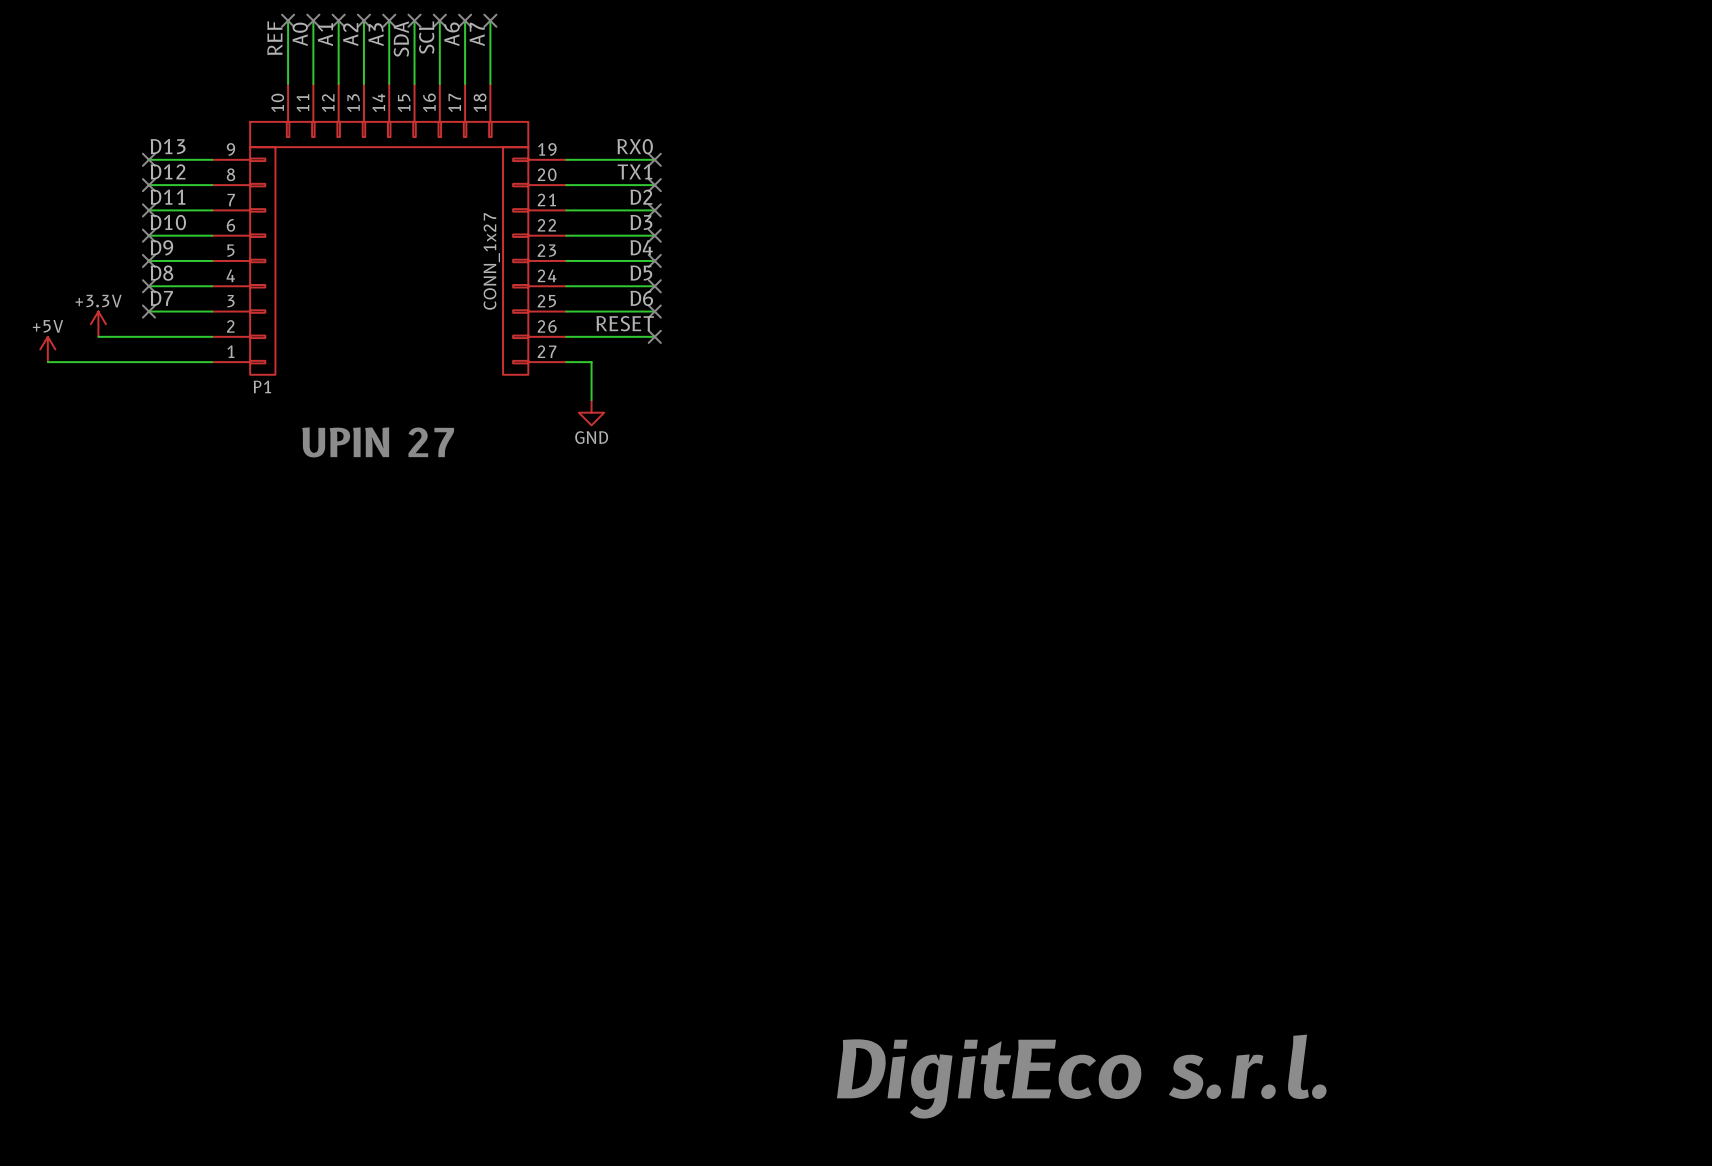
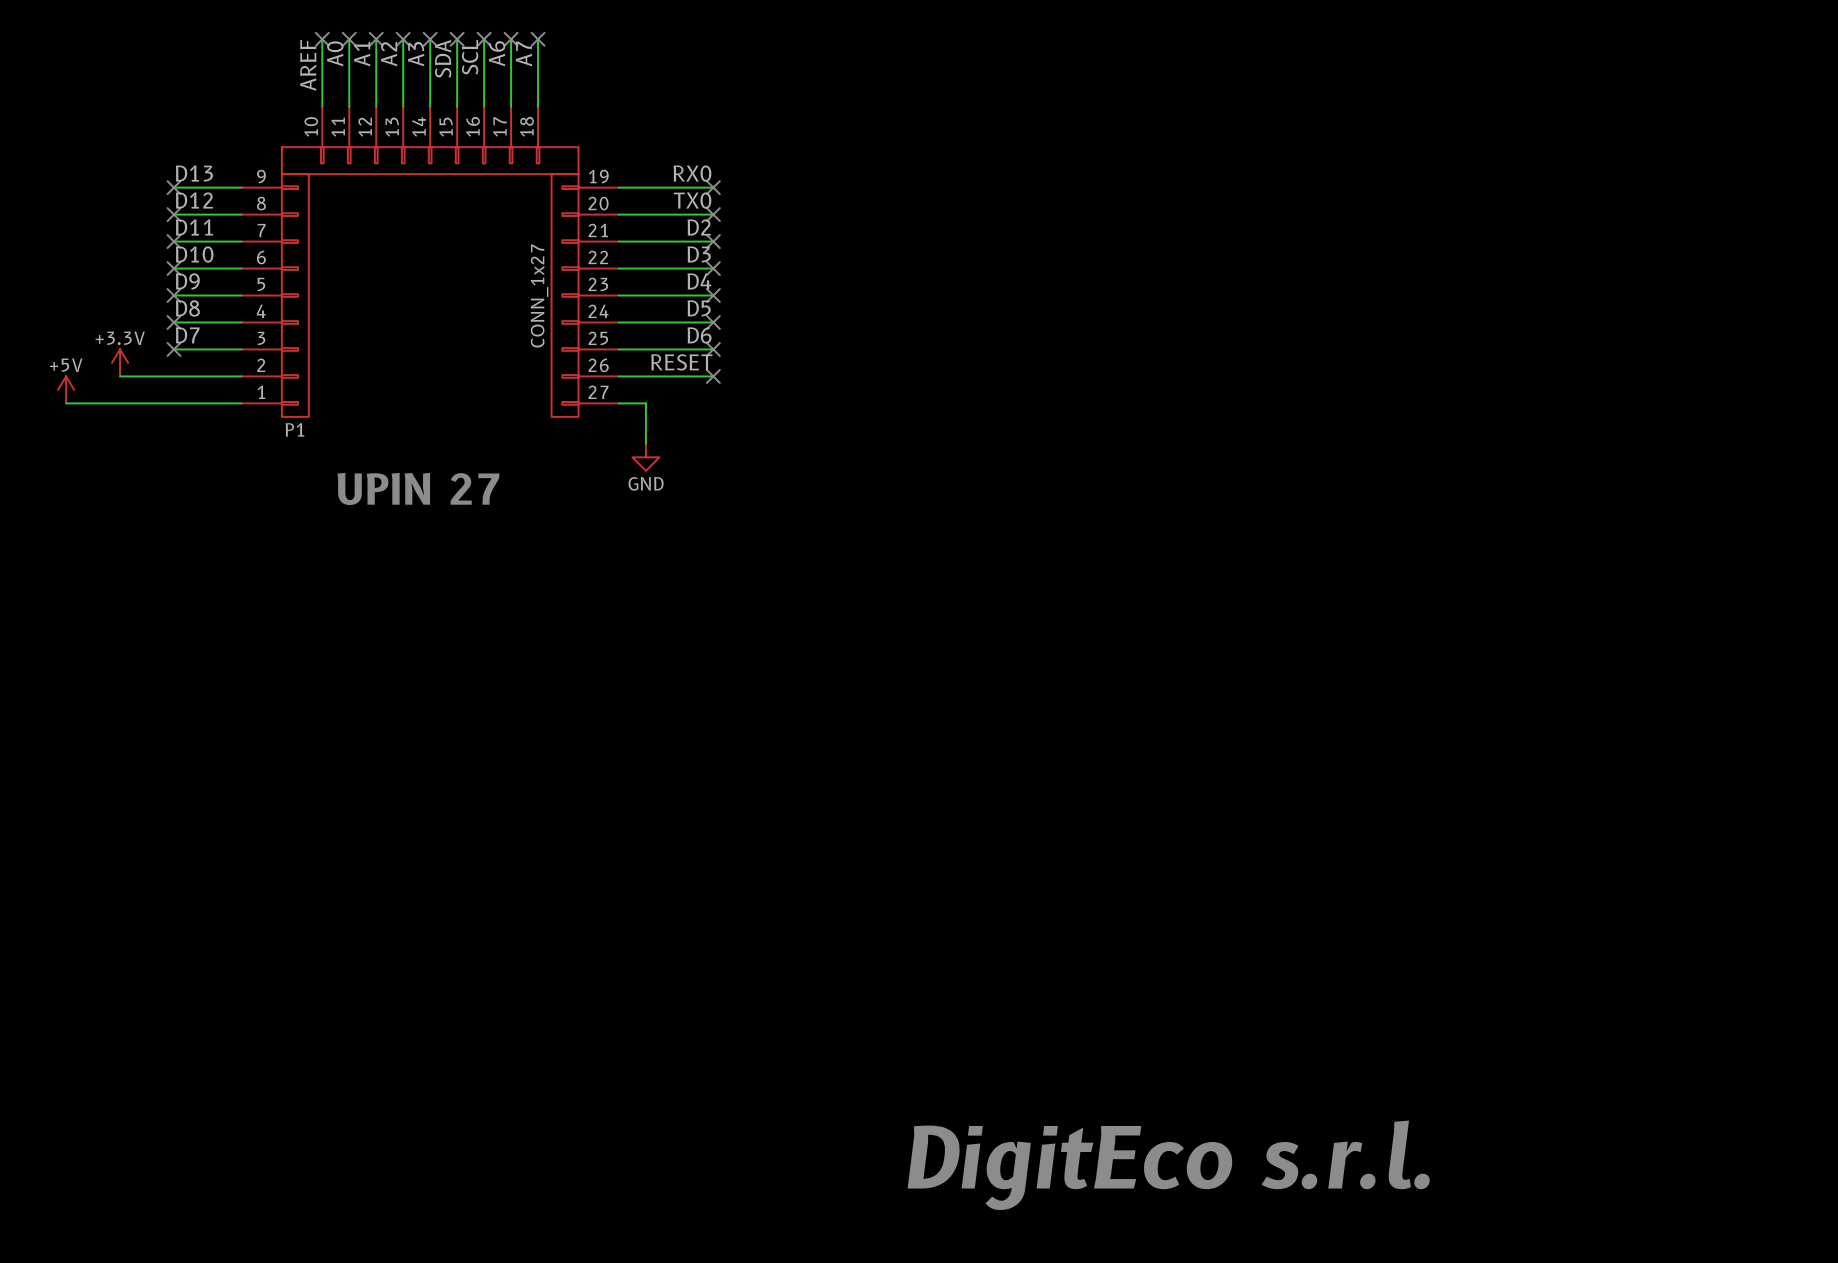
label: REF (274, 38) -> AREF (308, 65)
label: TX1 (634, 171) -> TX0 (692, 200)

